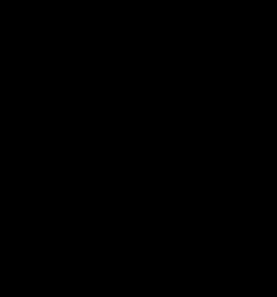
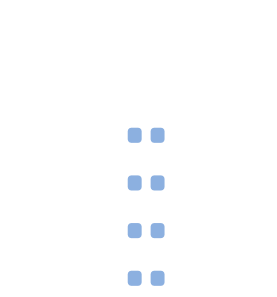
part: none -> (146, 135)
part: none -> (146, 182)
part: none -> (146, 230)
part: none -> (146, 278)

